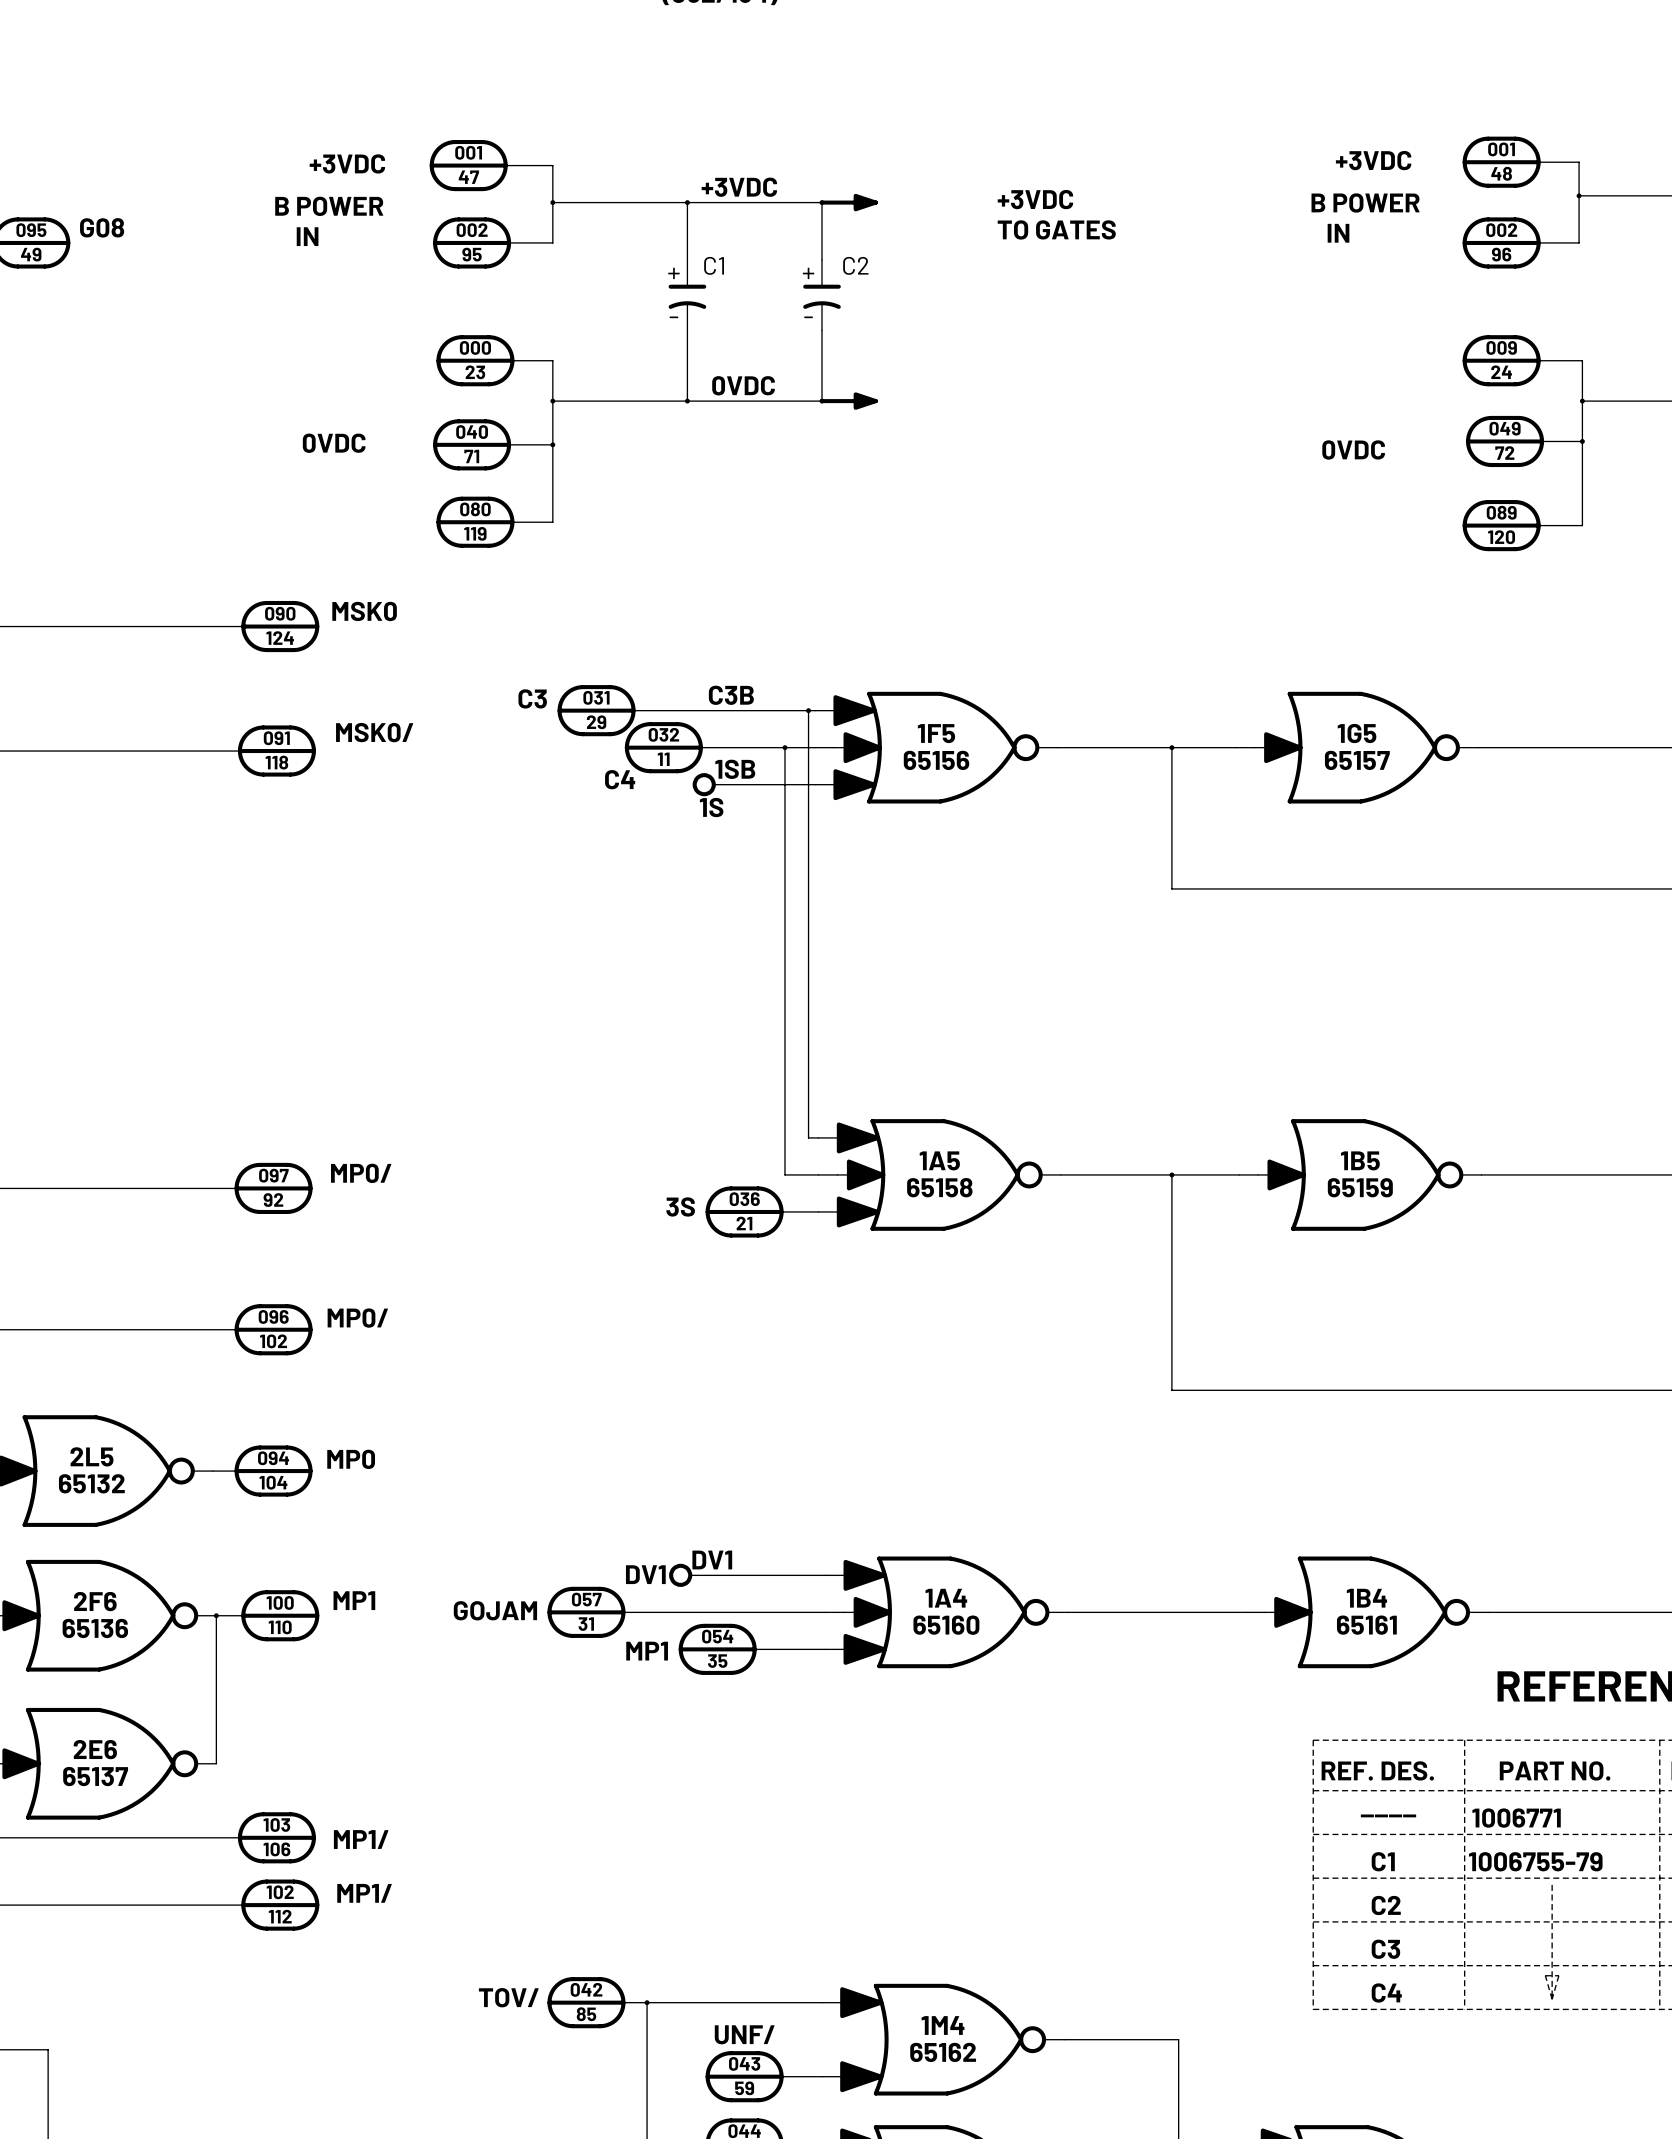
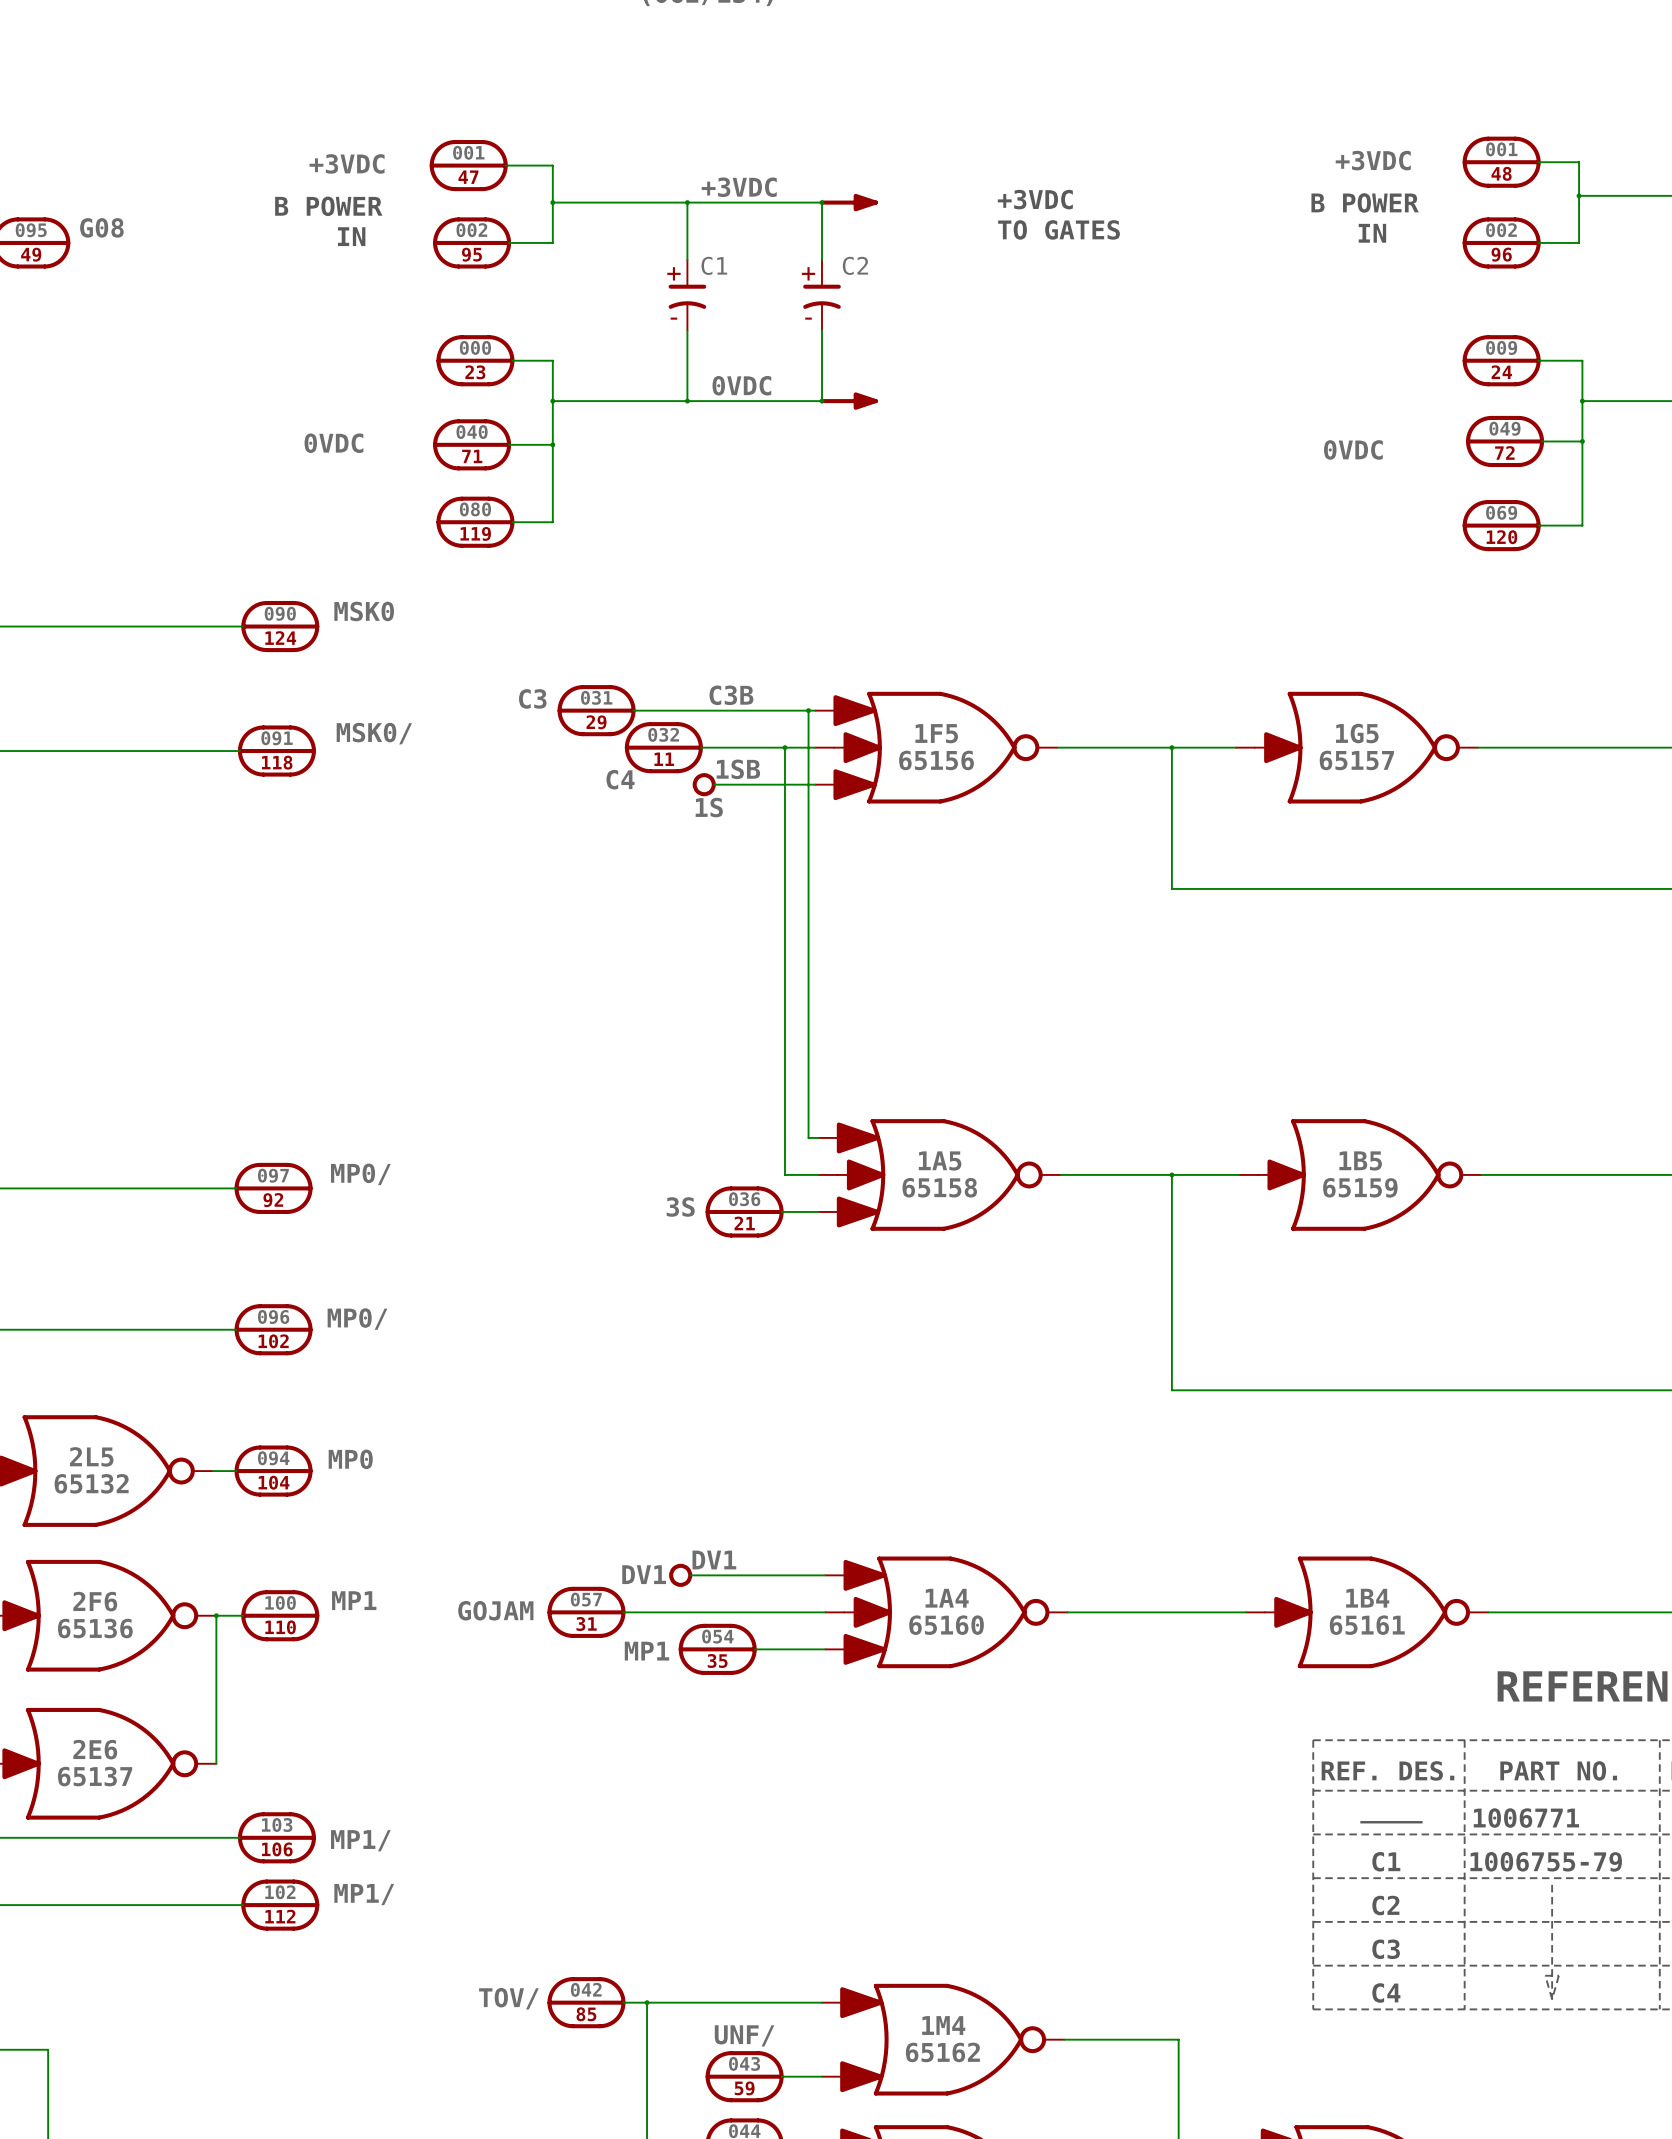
part text: 089 (1501, 512) -> 069 (1501, 512)

